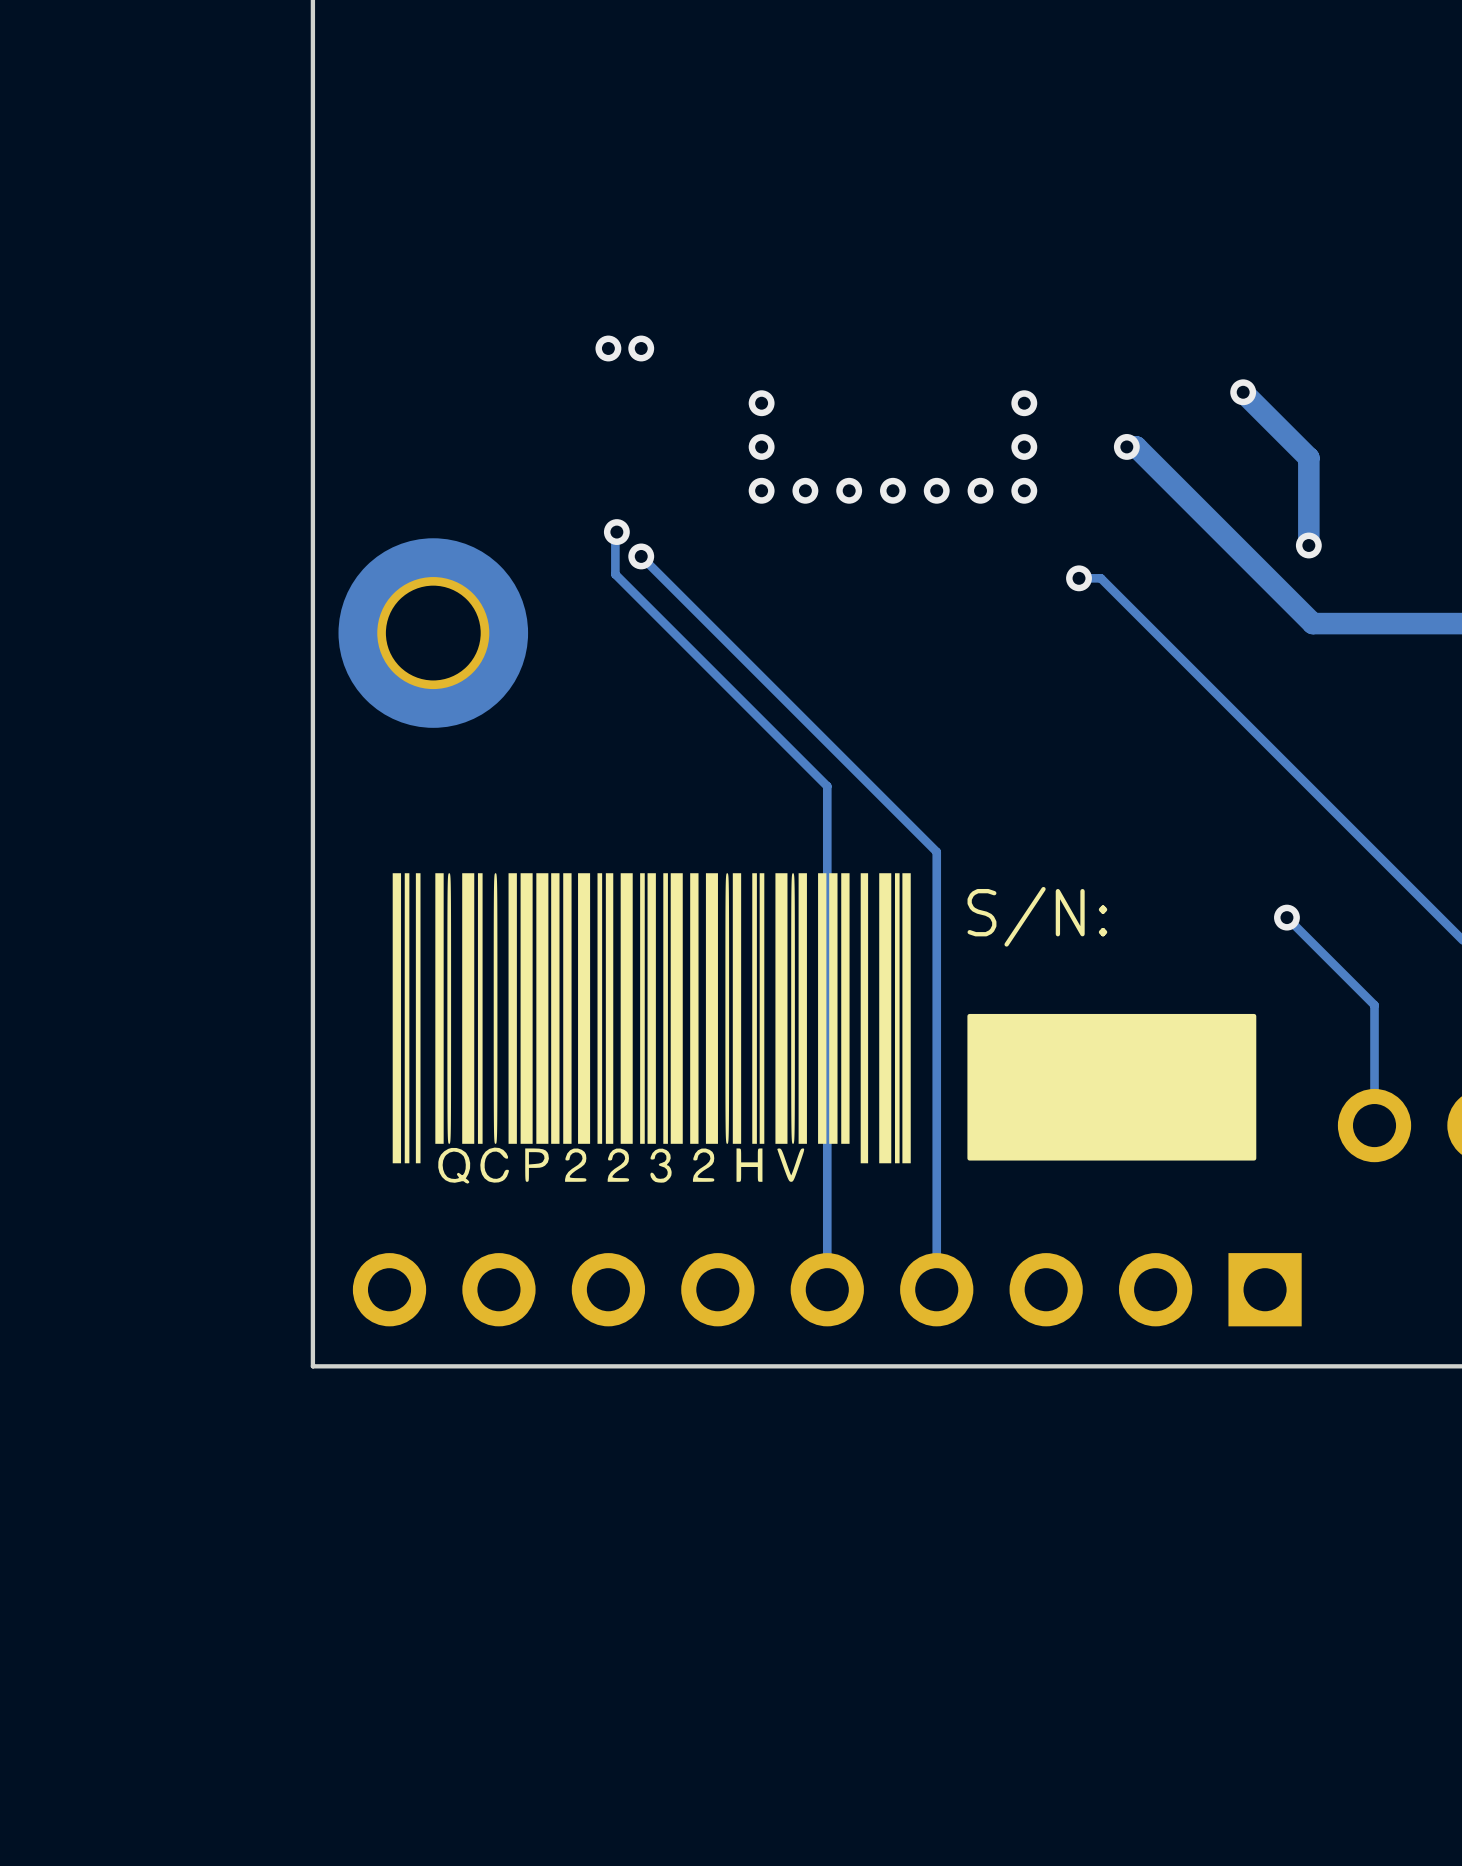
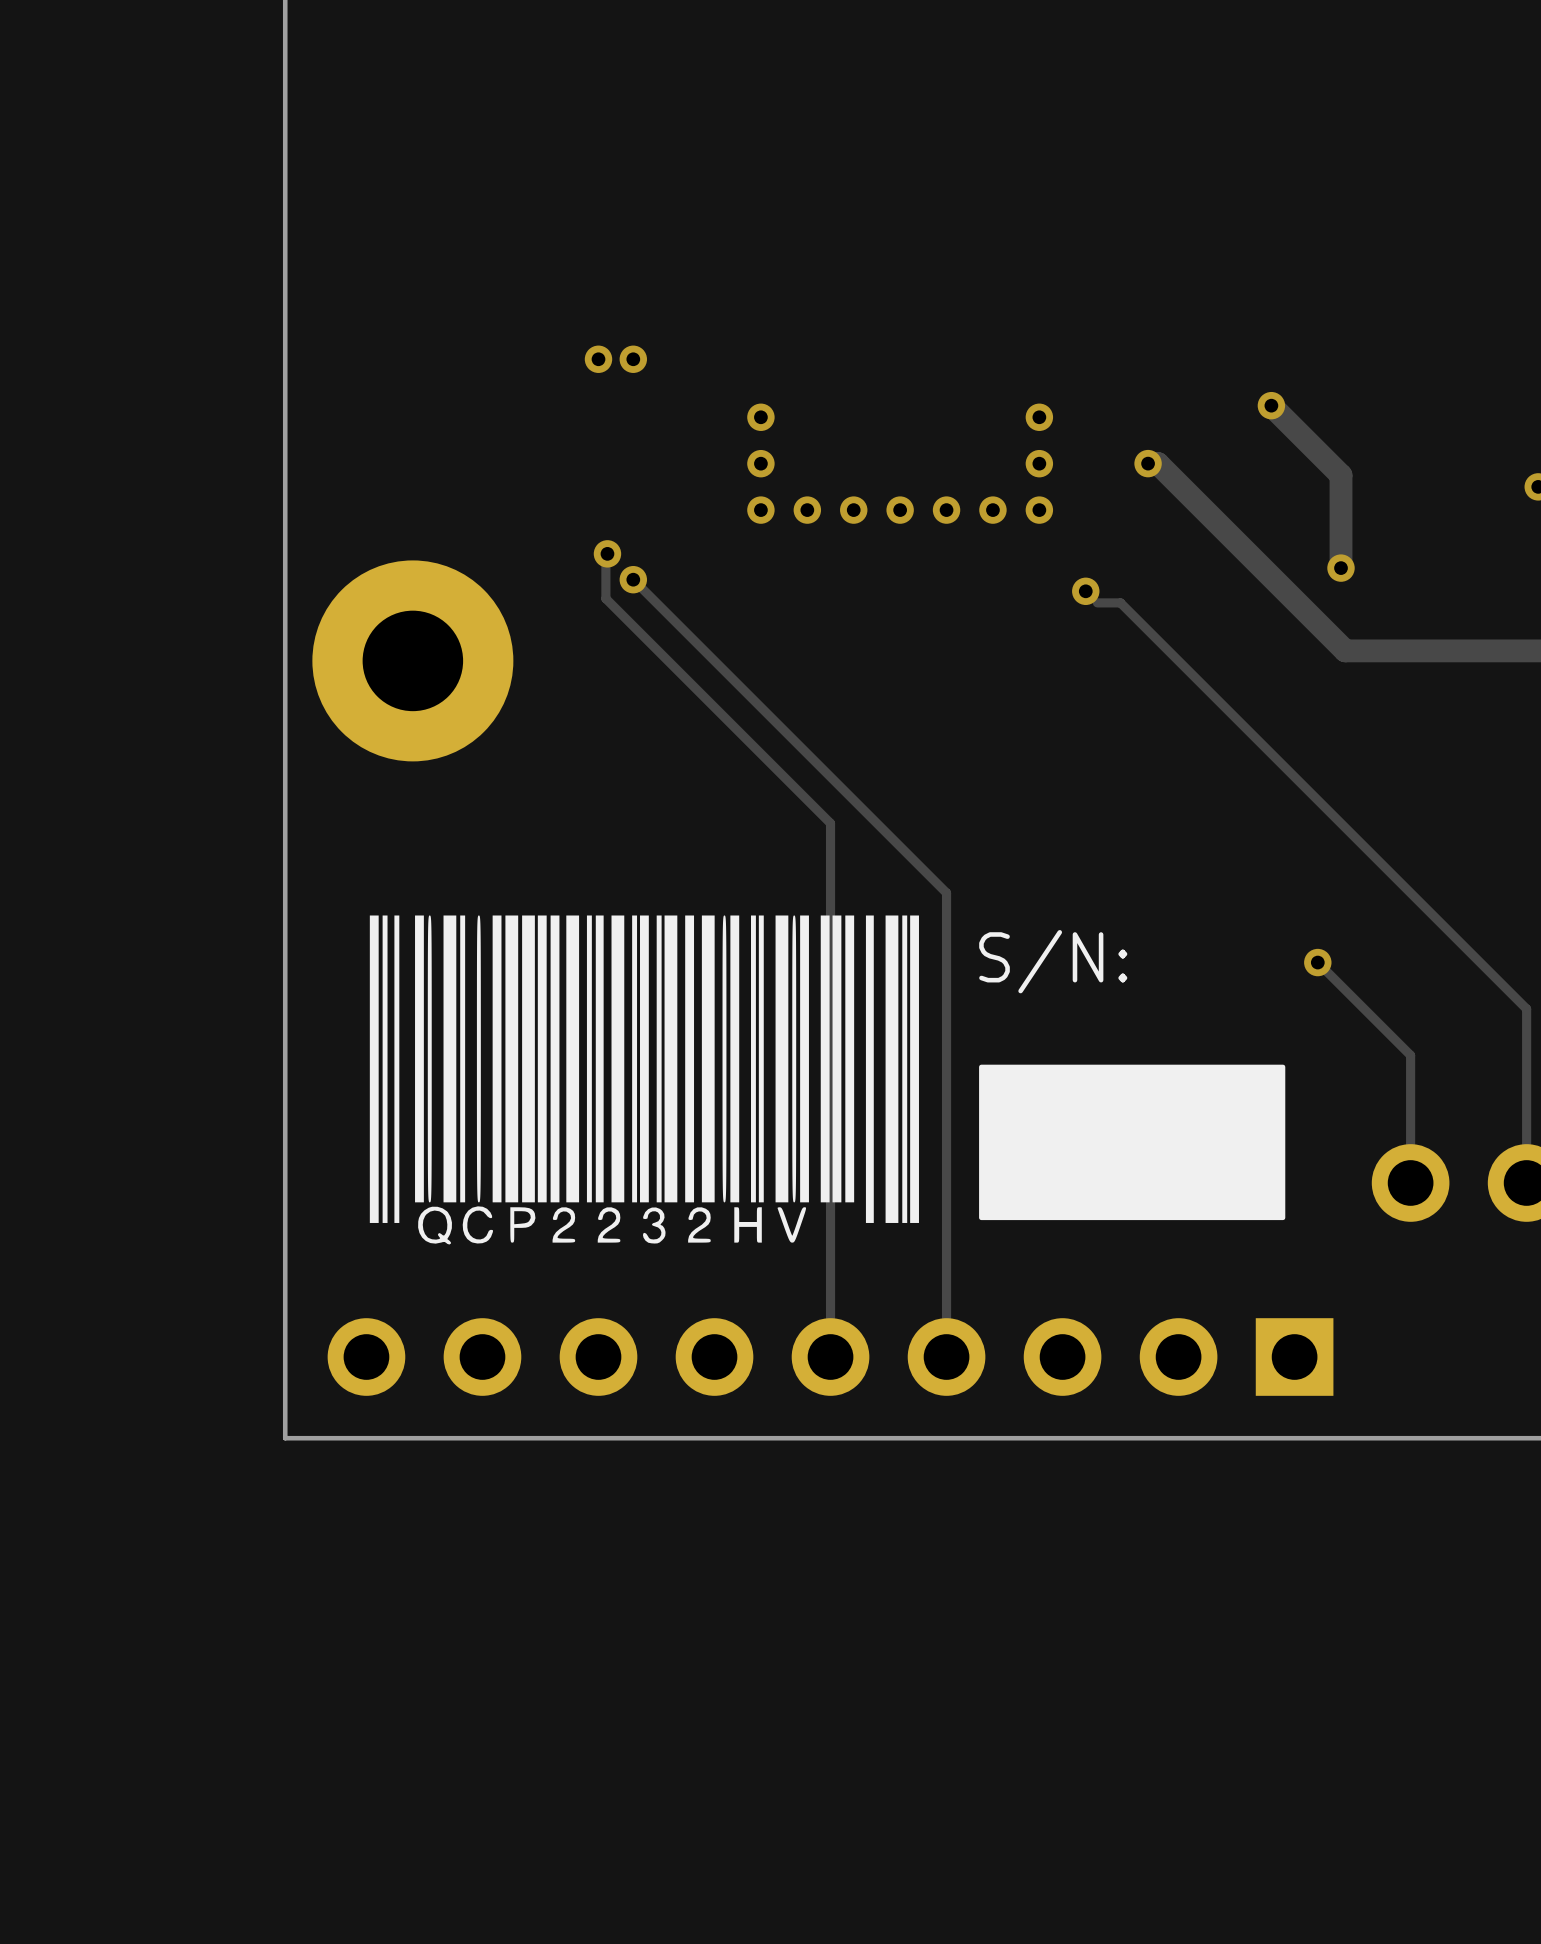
via position: (1079, 578) -> (1085, 591)

